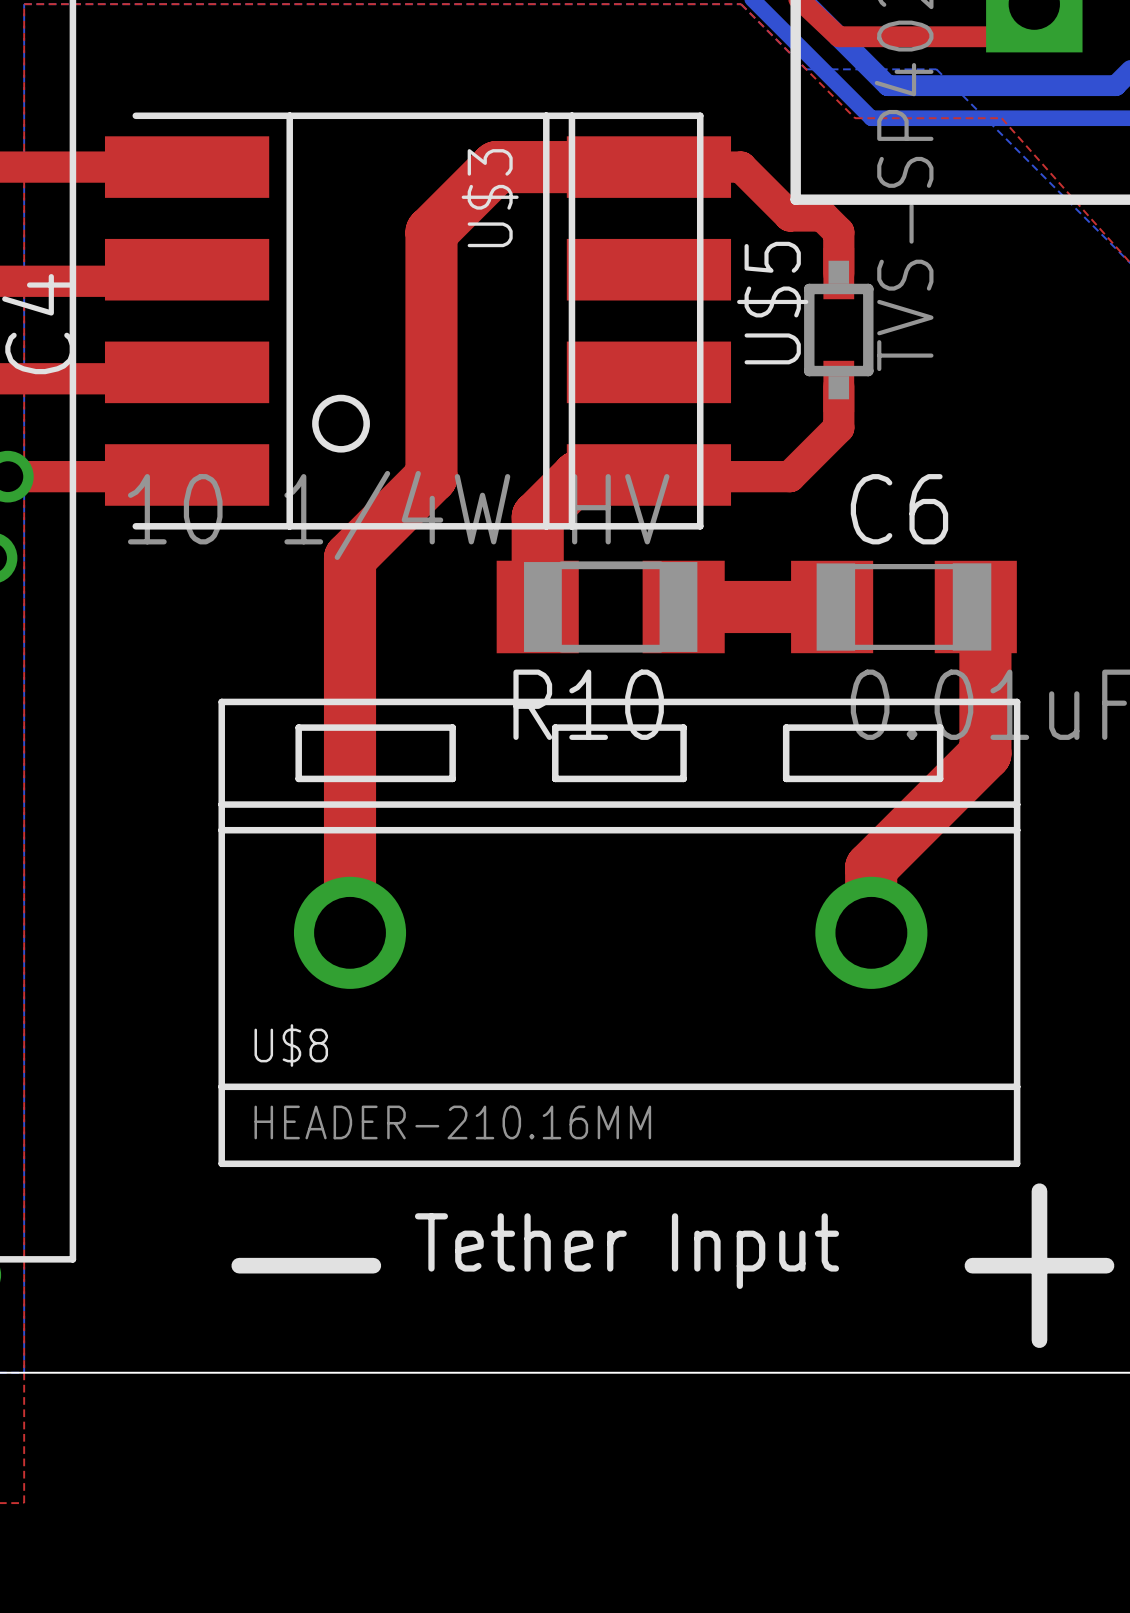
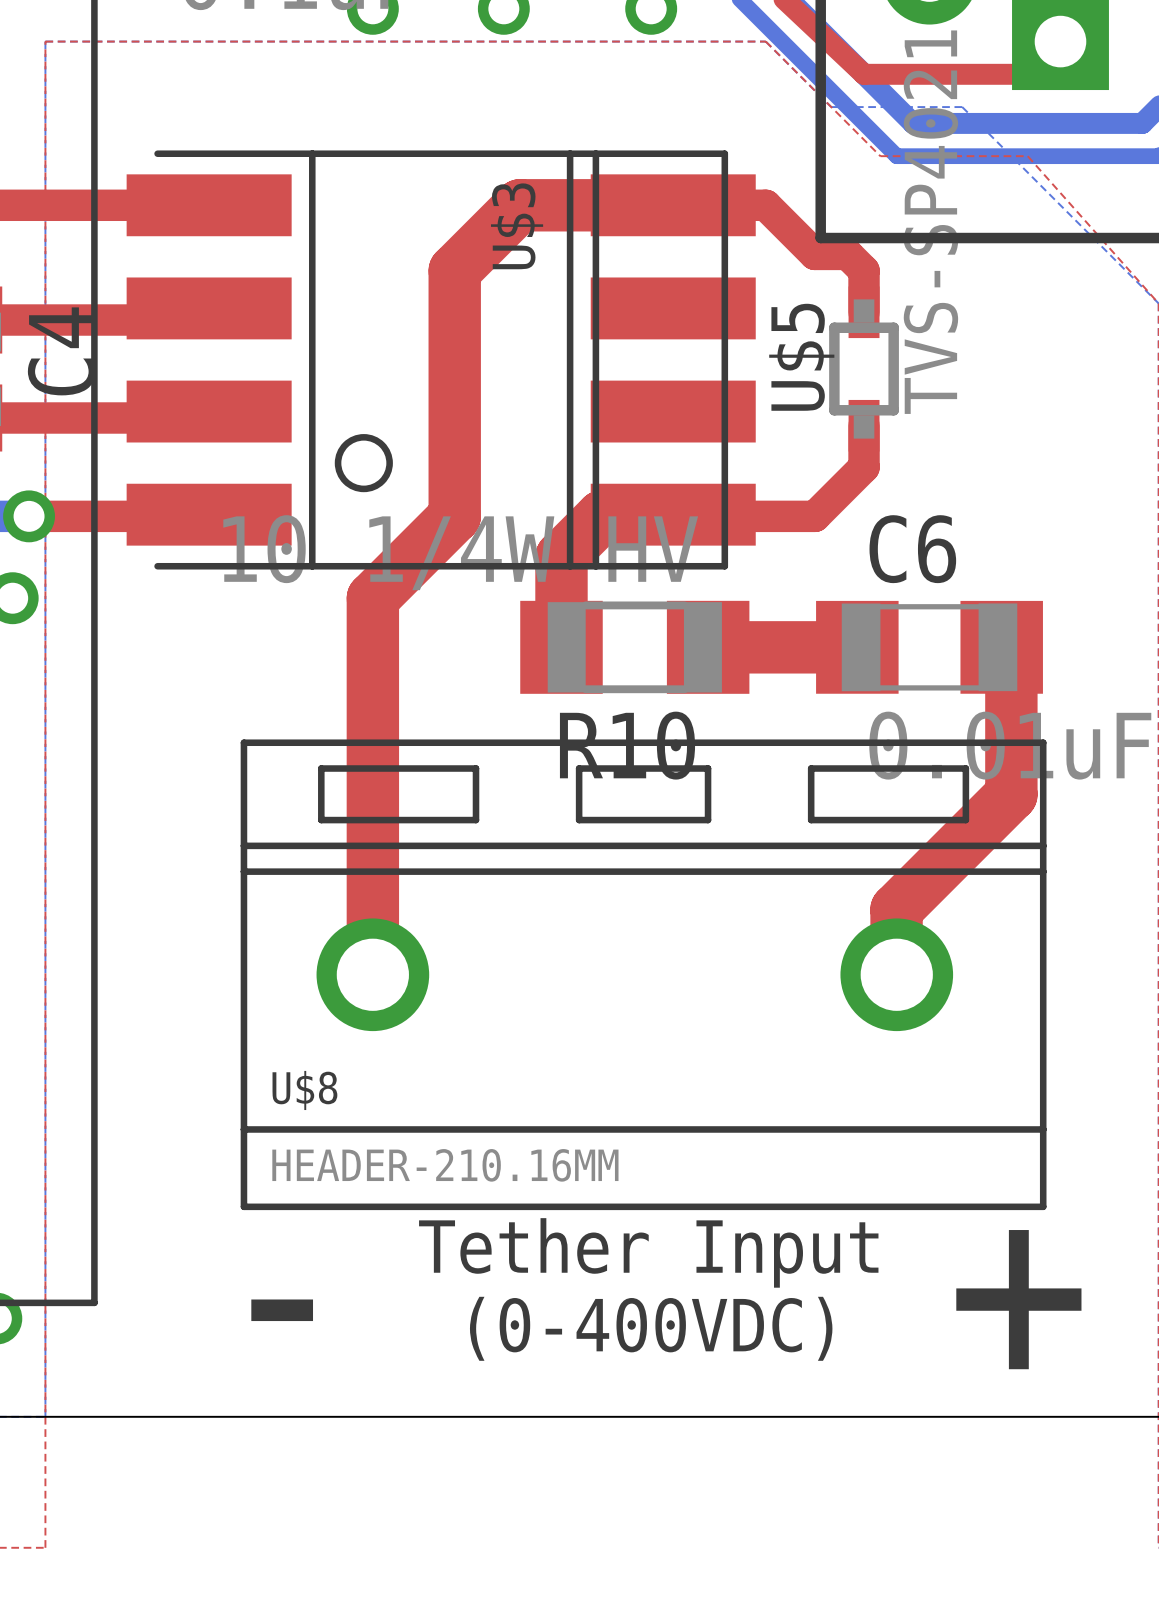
text position: Tether Input (626, 1251) -> Tether Input (648, 1252)
text: none -> (0-400VDC) (651, 1328)

